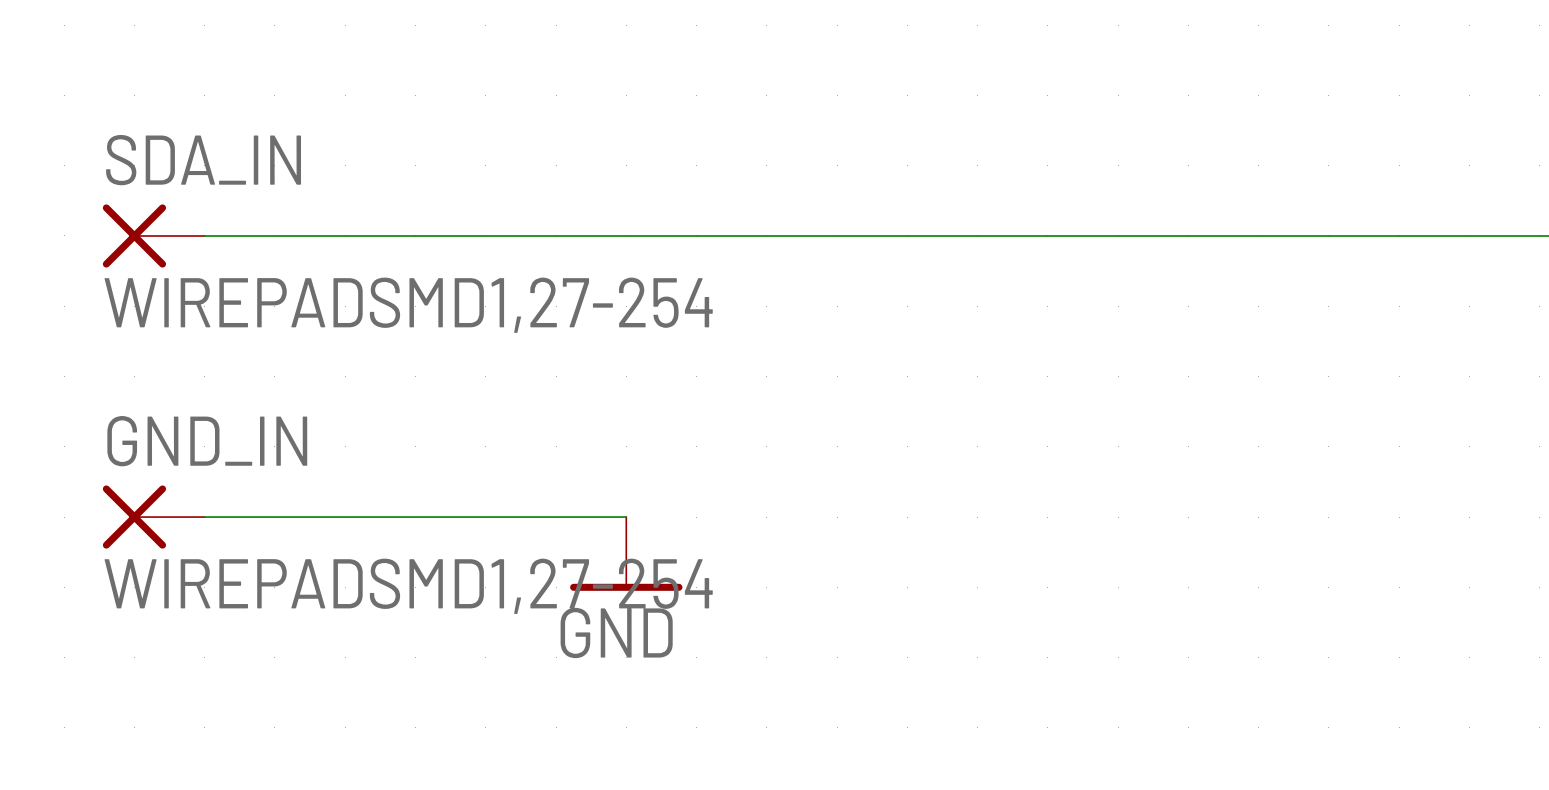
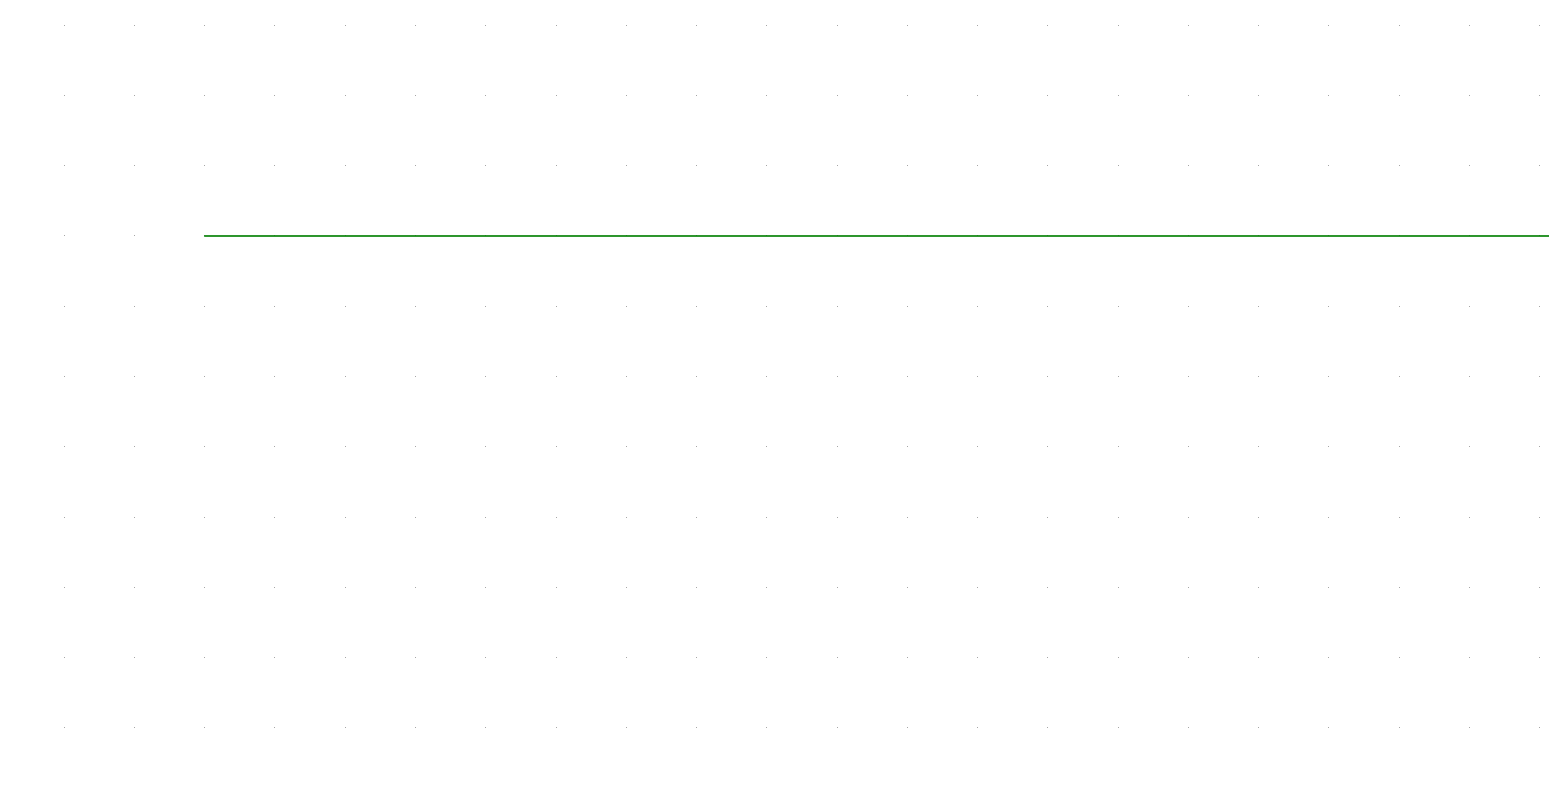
SDA_IN: WIREPADSMD1,27-254 (153, 235) -> none
GND_IN: WIREPADSMD1,27-254 (153, 517) -> none
wire: (204, 517) (626, 517) -> none
power symbol: GND (626, 553) -> none

